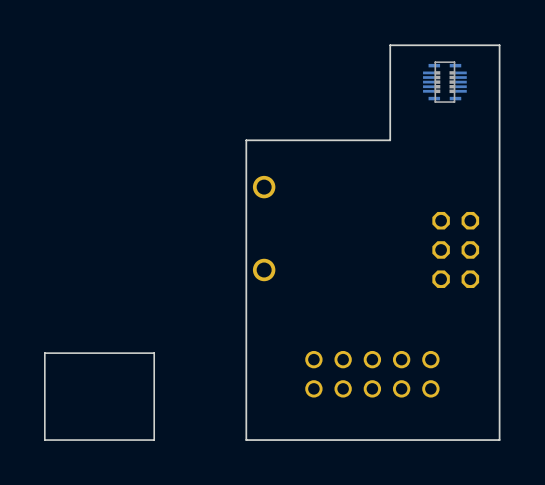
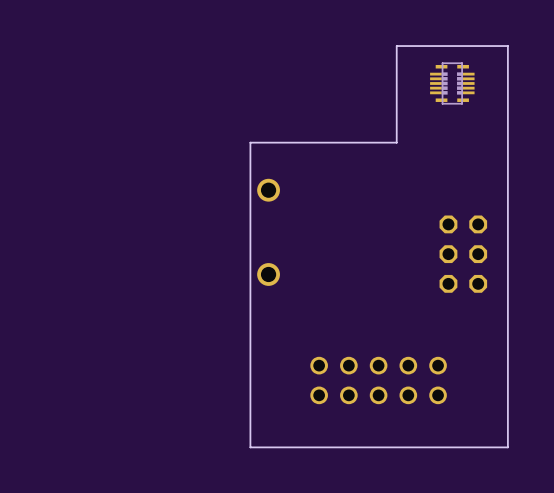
board edge: (154, 353) (44, 353) (44, 440) (154, 440) (154, 353) -> none

